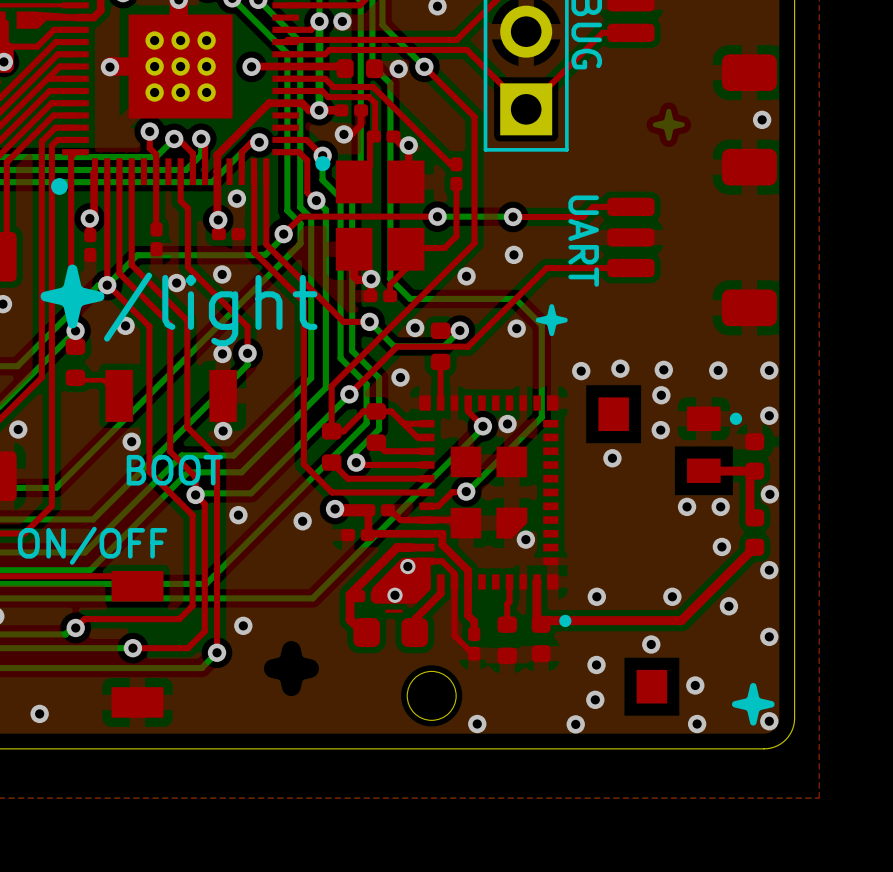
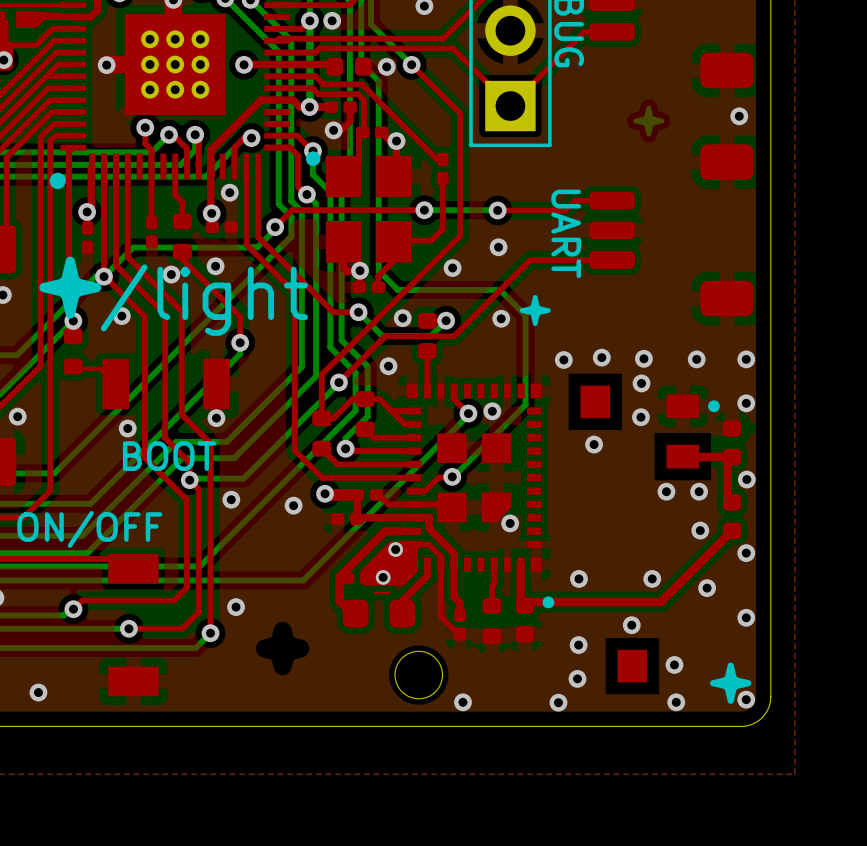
top track: (187, 228) (187, 259) -> none
part: none -> (182, 236)
via: (222, 353) -> none

